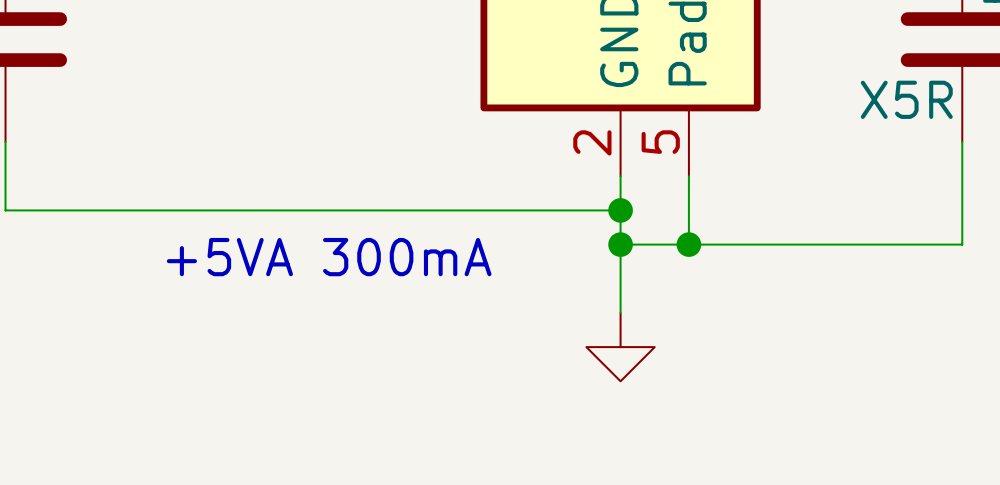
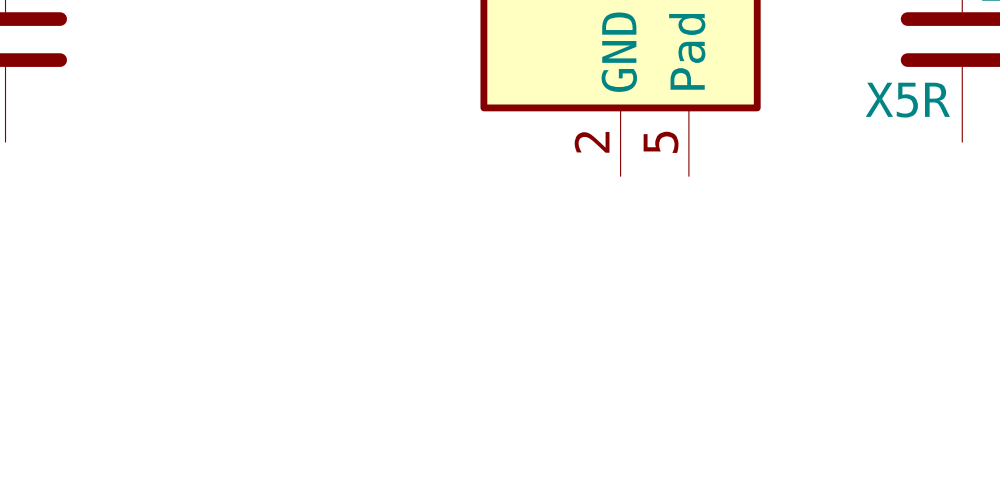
wire: (5, 142) (5, 210) (620, 210) -> none
wire: (962, 142) (962, 244) (620, 244) -> none
wire: (620, 176) (620, 312) -> none
wire: (688, 176) (688, 244) -> none
junction: (620, 210) -> none
junction: (620, 244) -> none
junction: (688, 244) -> none
text: +5VA 300mA (329, 257) -> none
power symbol: (620, 347) -> none

